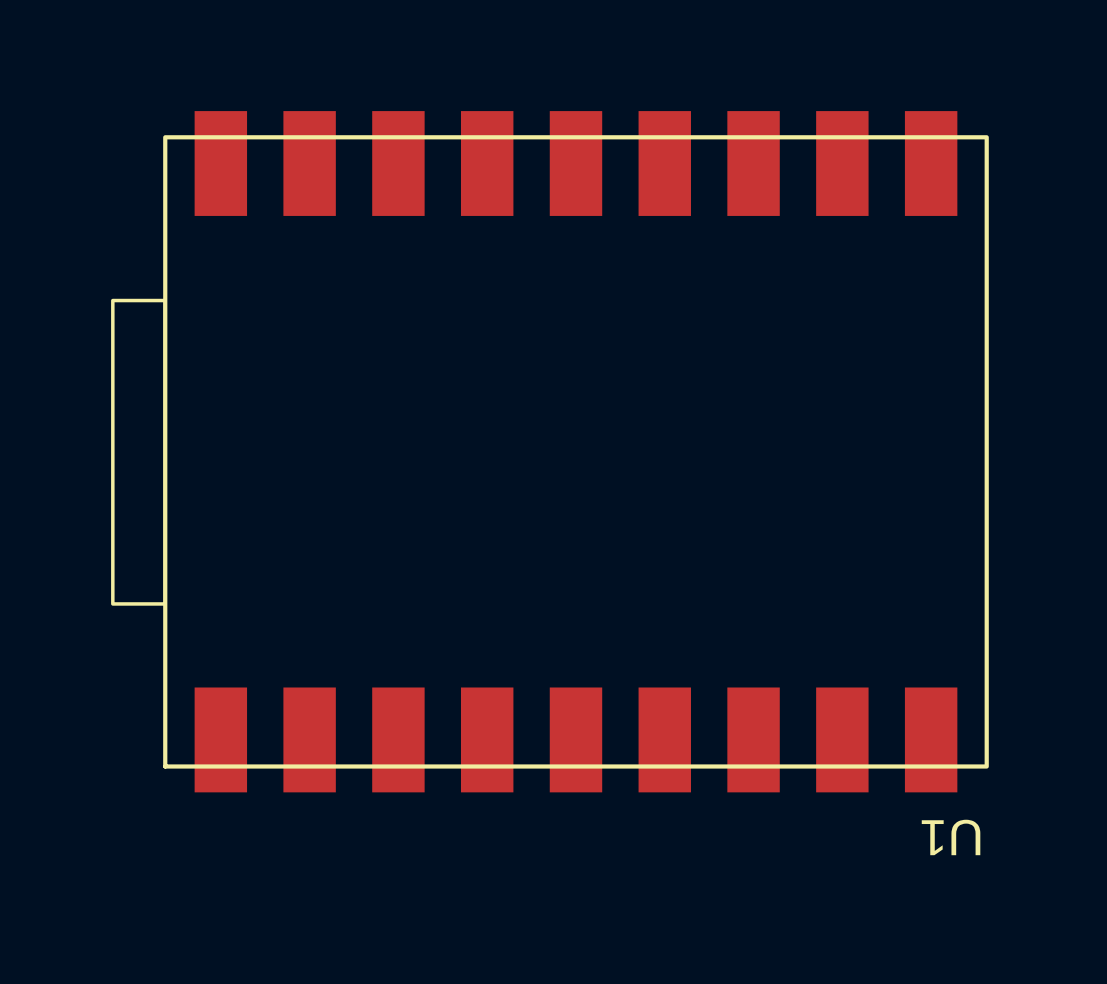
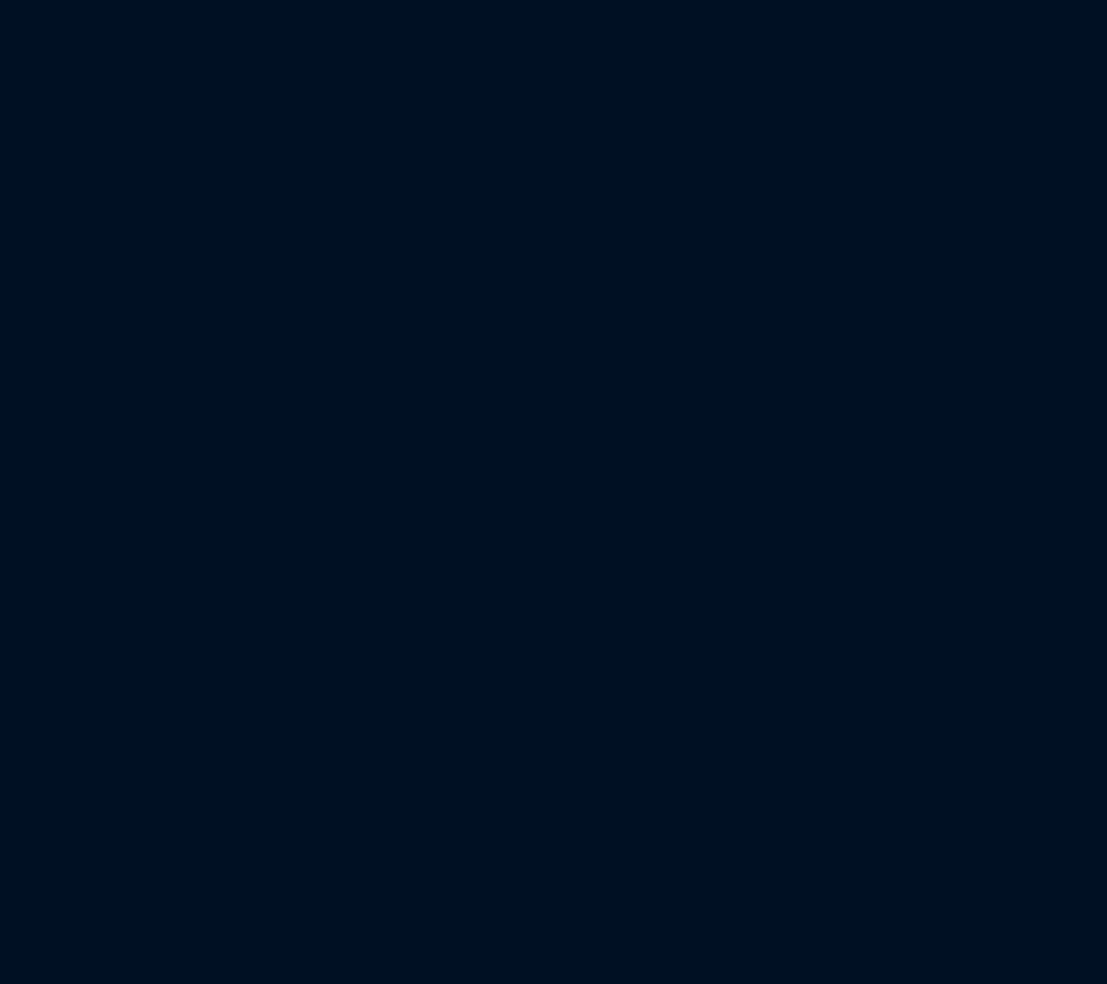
U1: (549, 451) -> none

